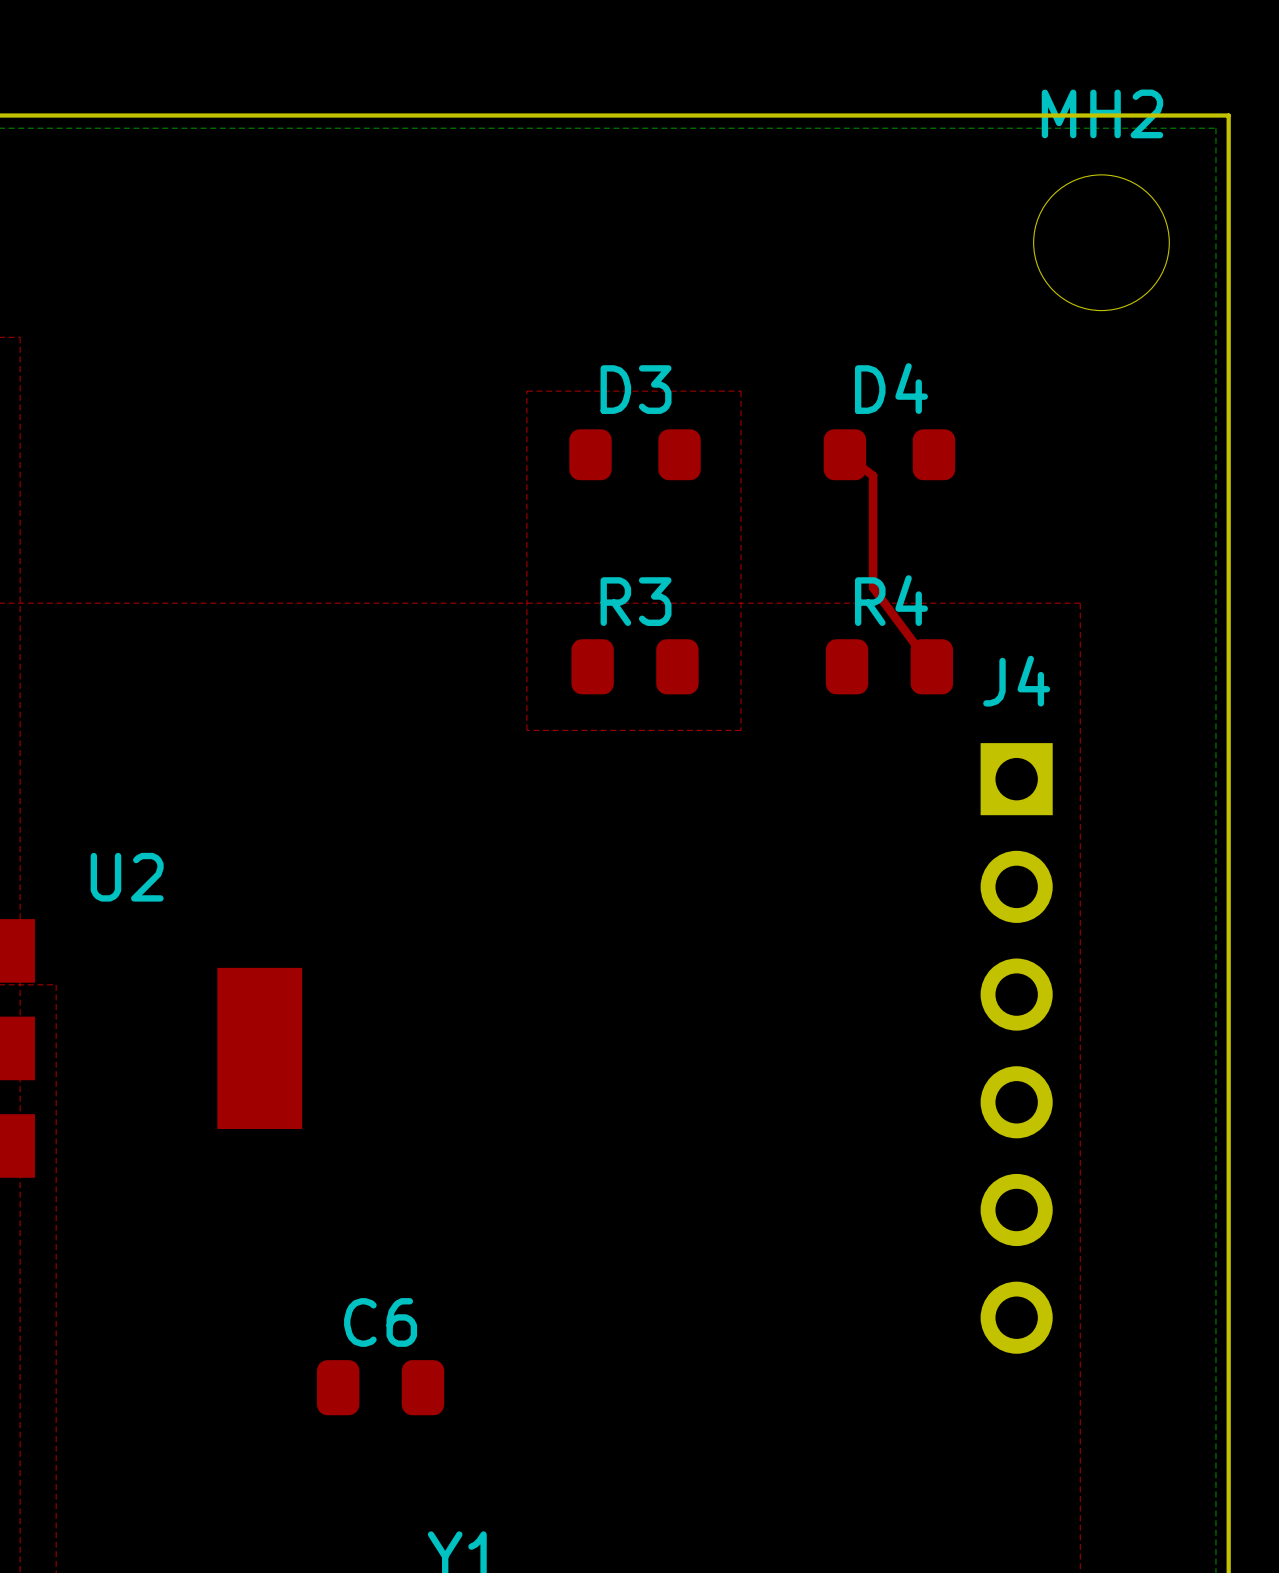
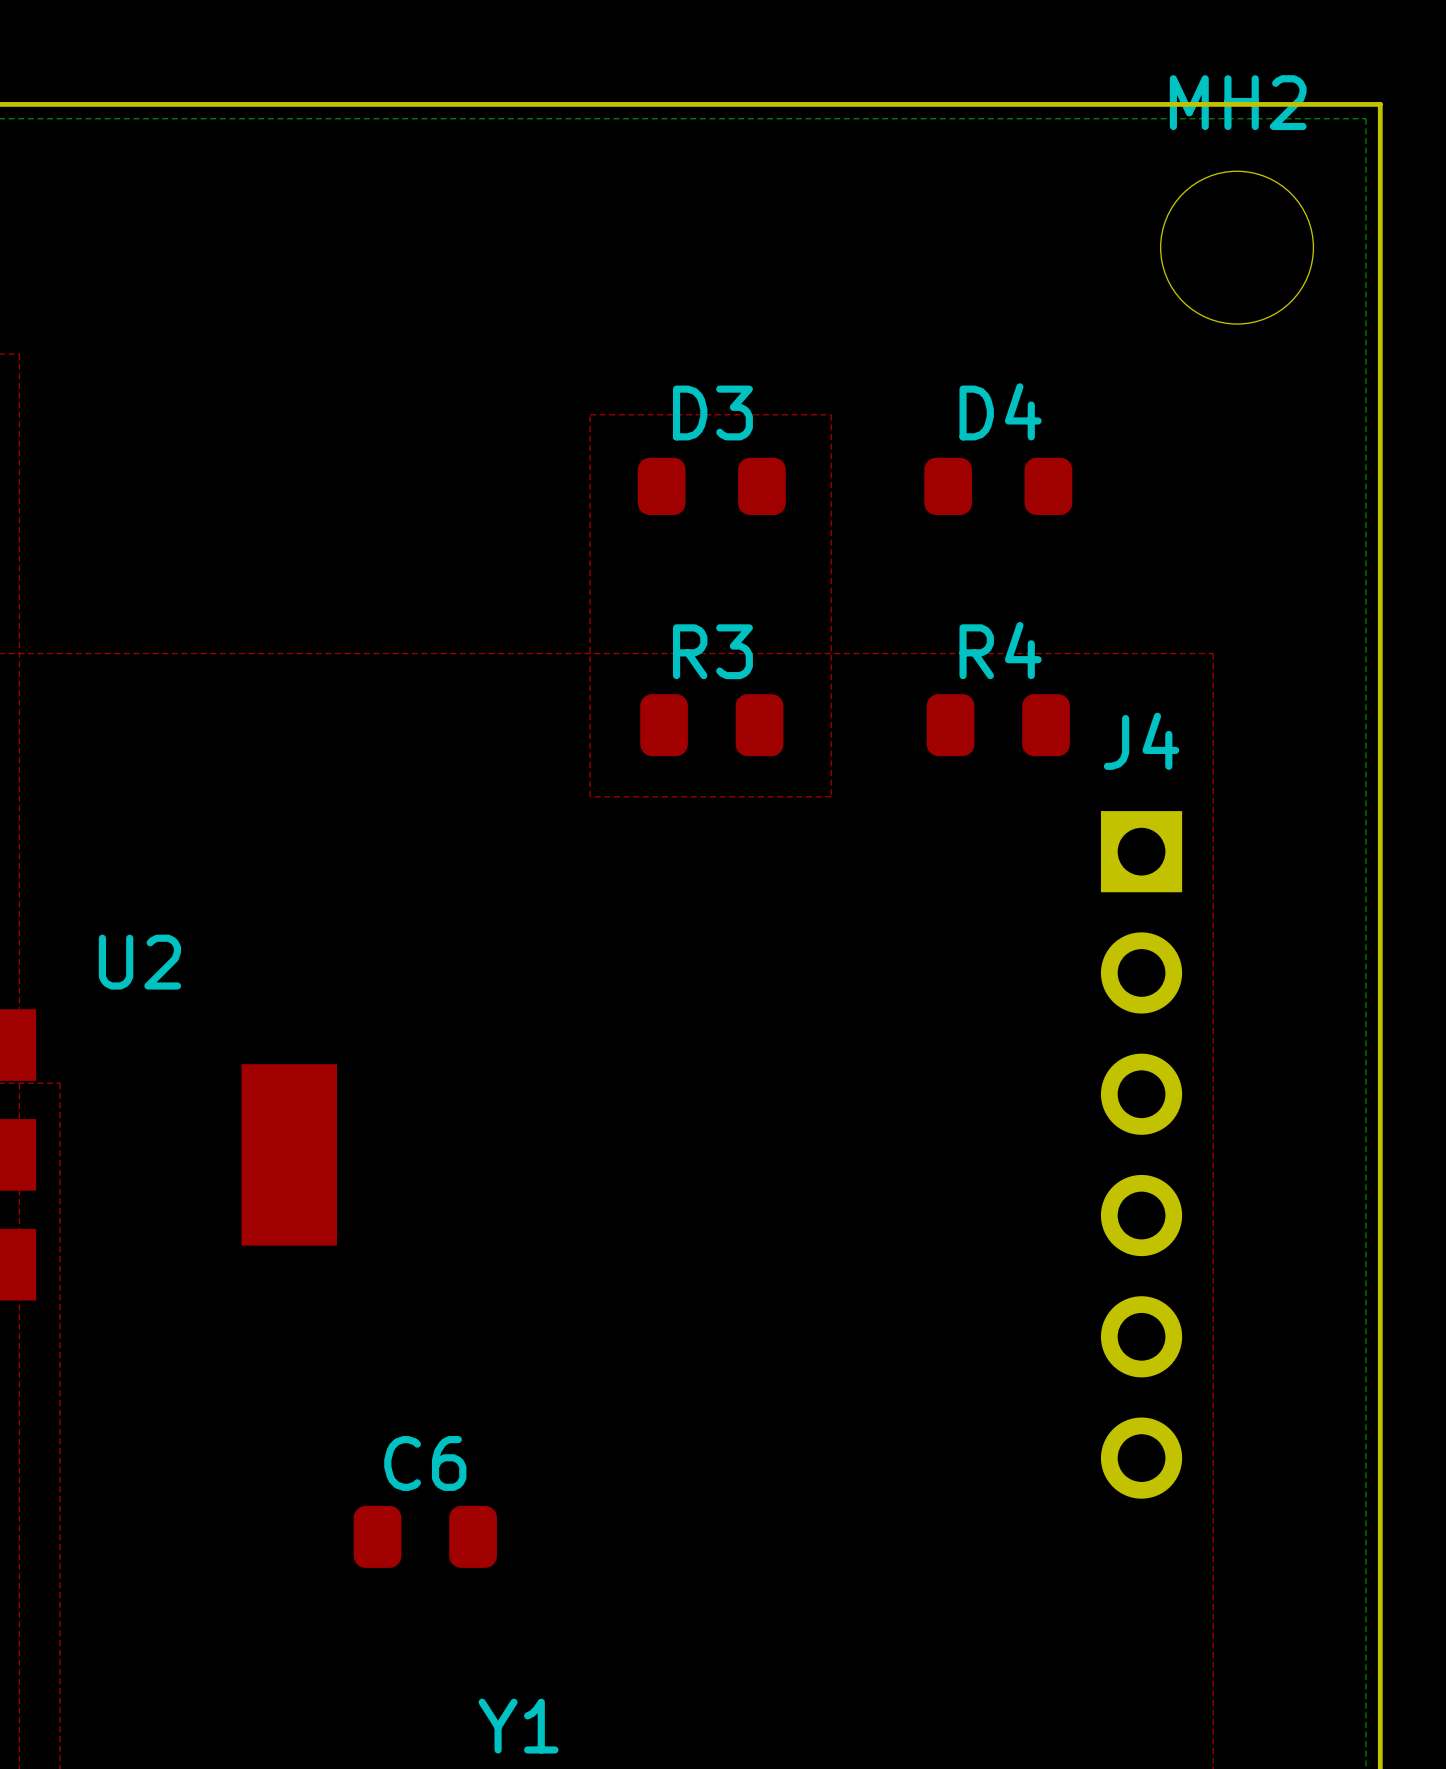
top track: (844, 454) (873, 475) (873, 587) (931, 666) -> none

